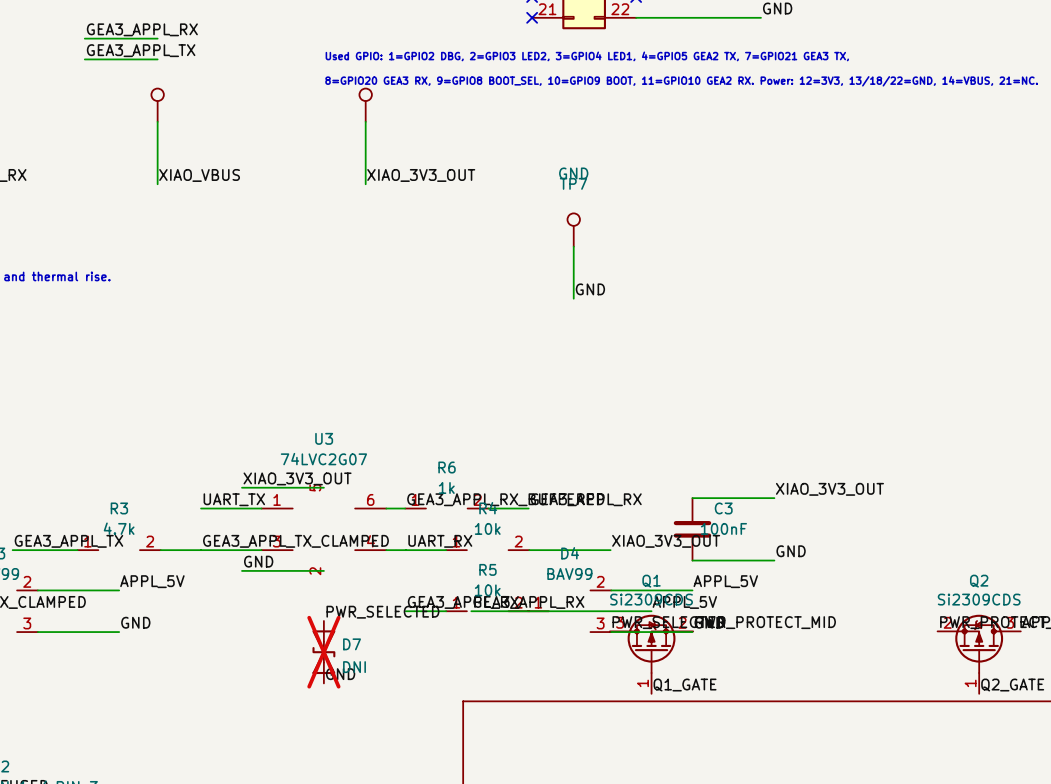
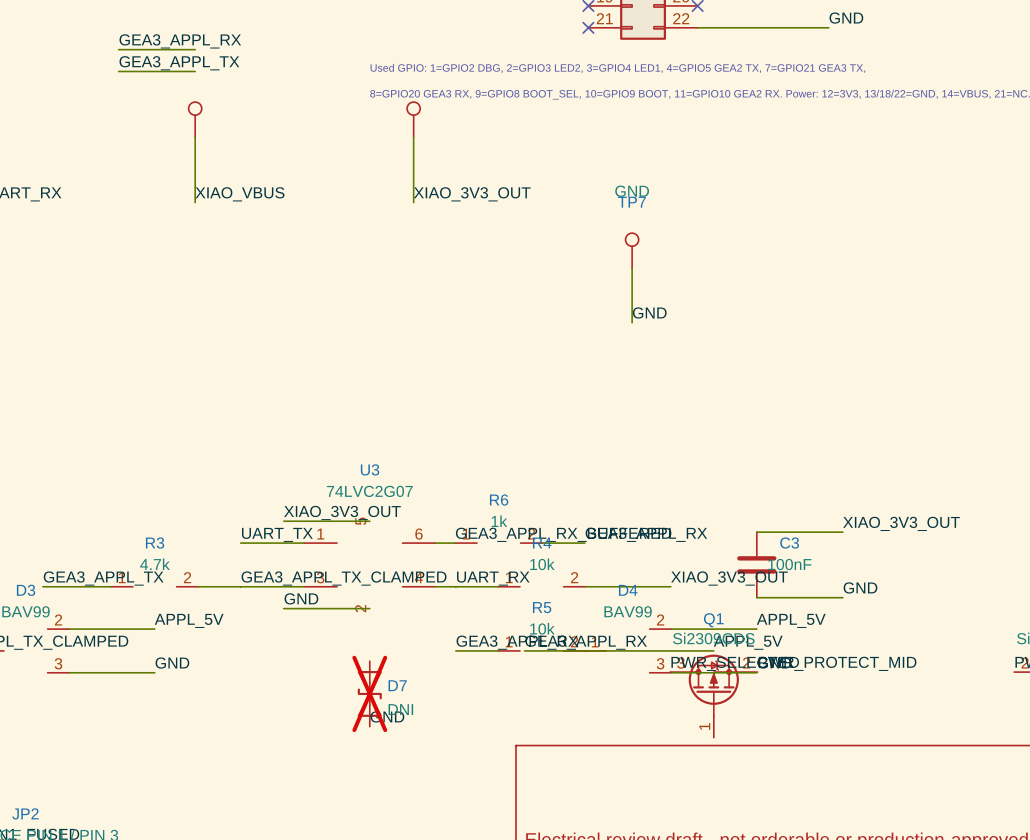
label: PWR_SELECTED (382, 612) -> none
label: Q1_GATE (685, 685) -> none

